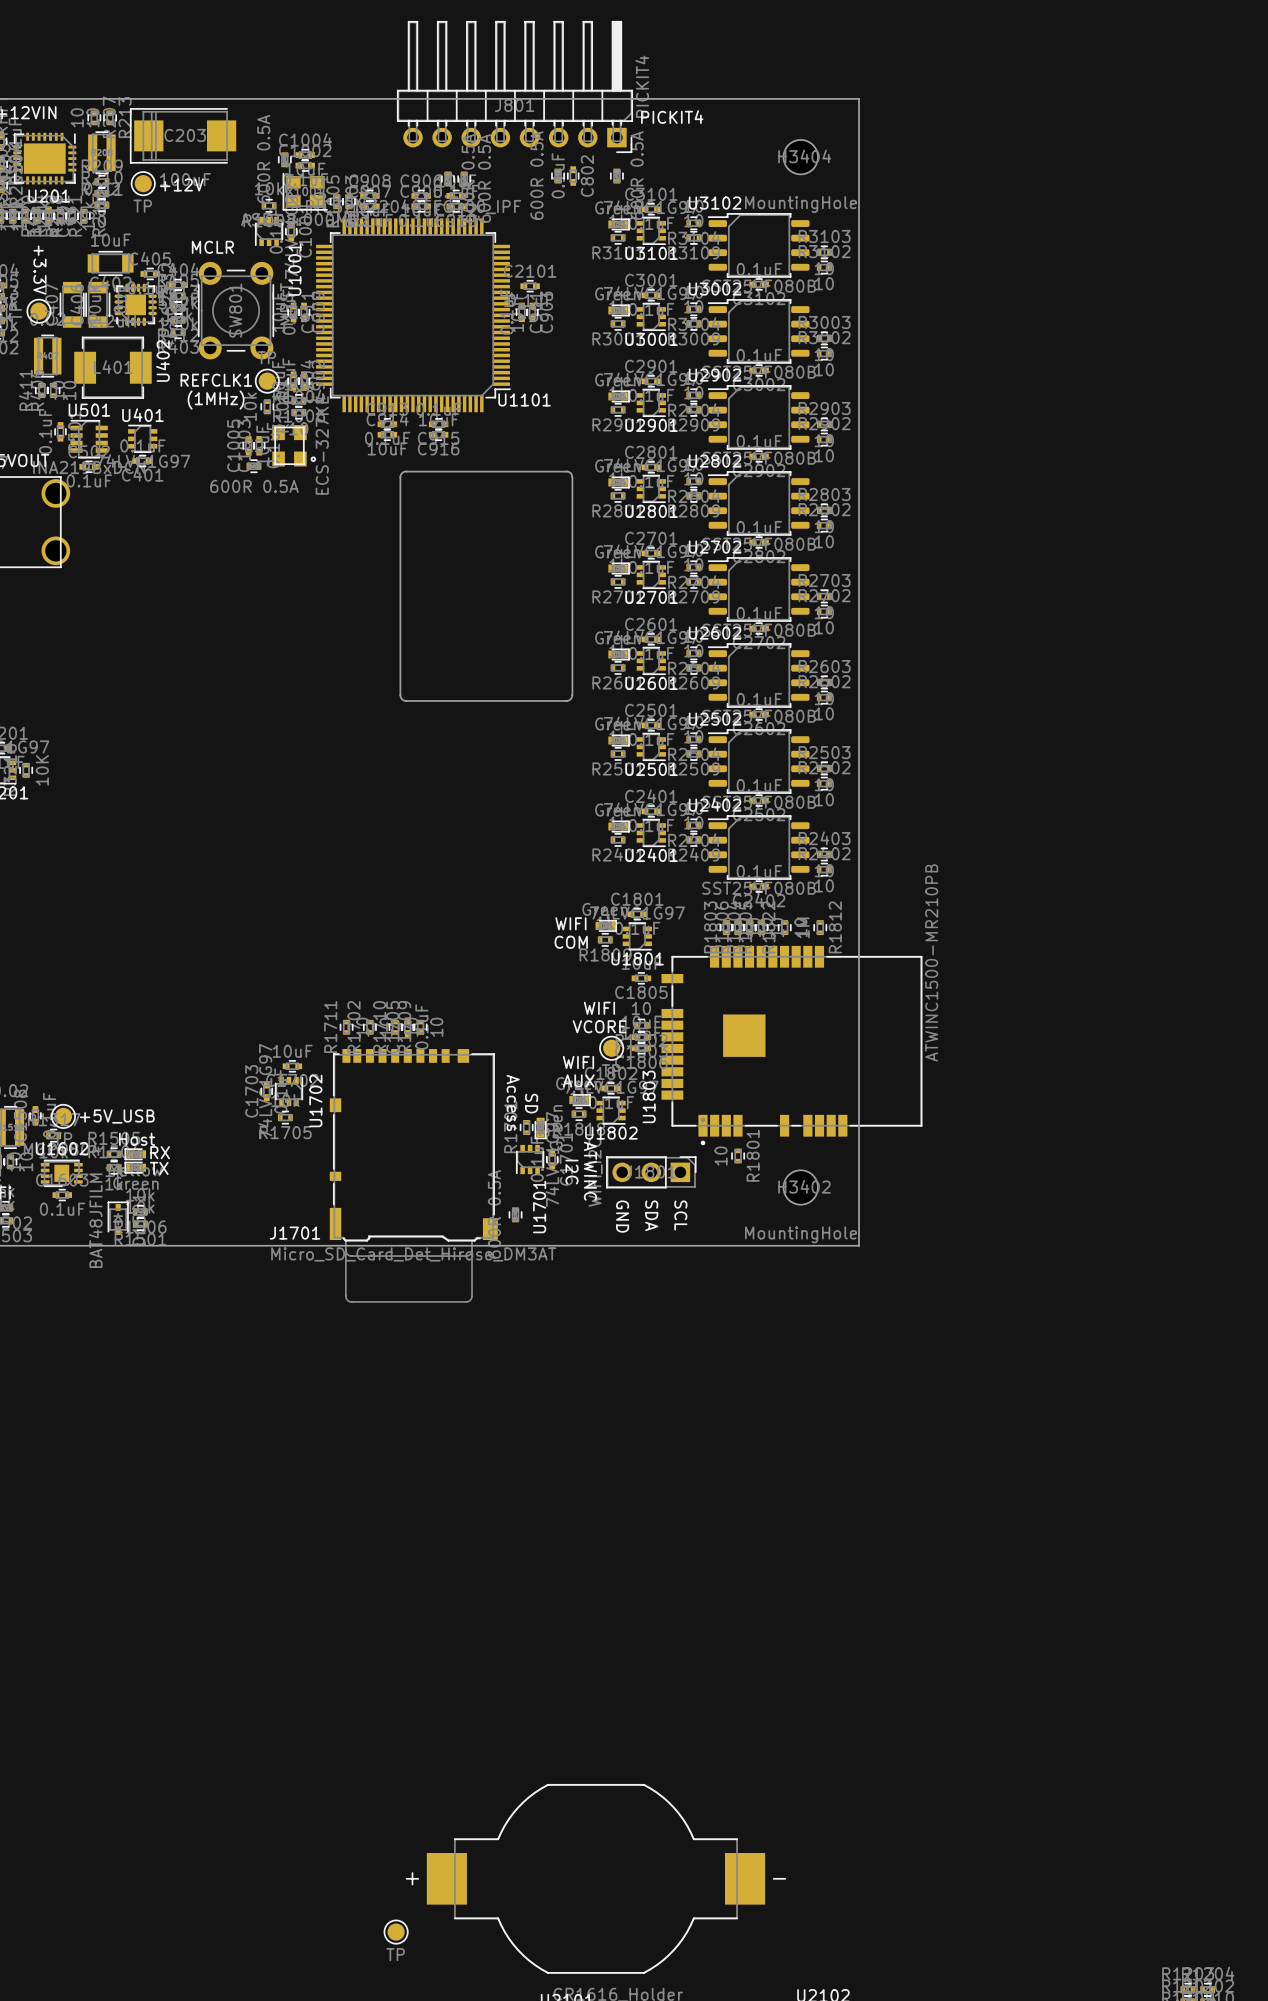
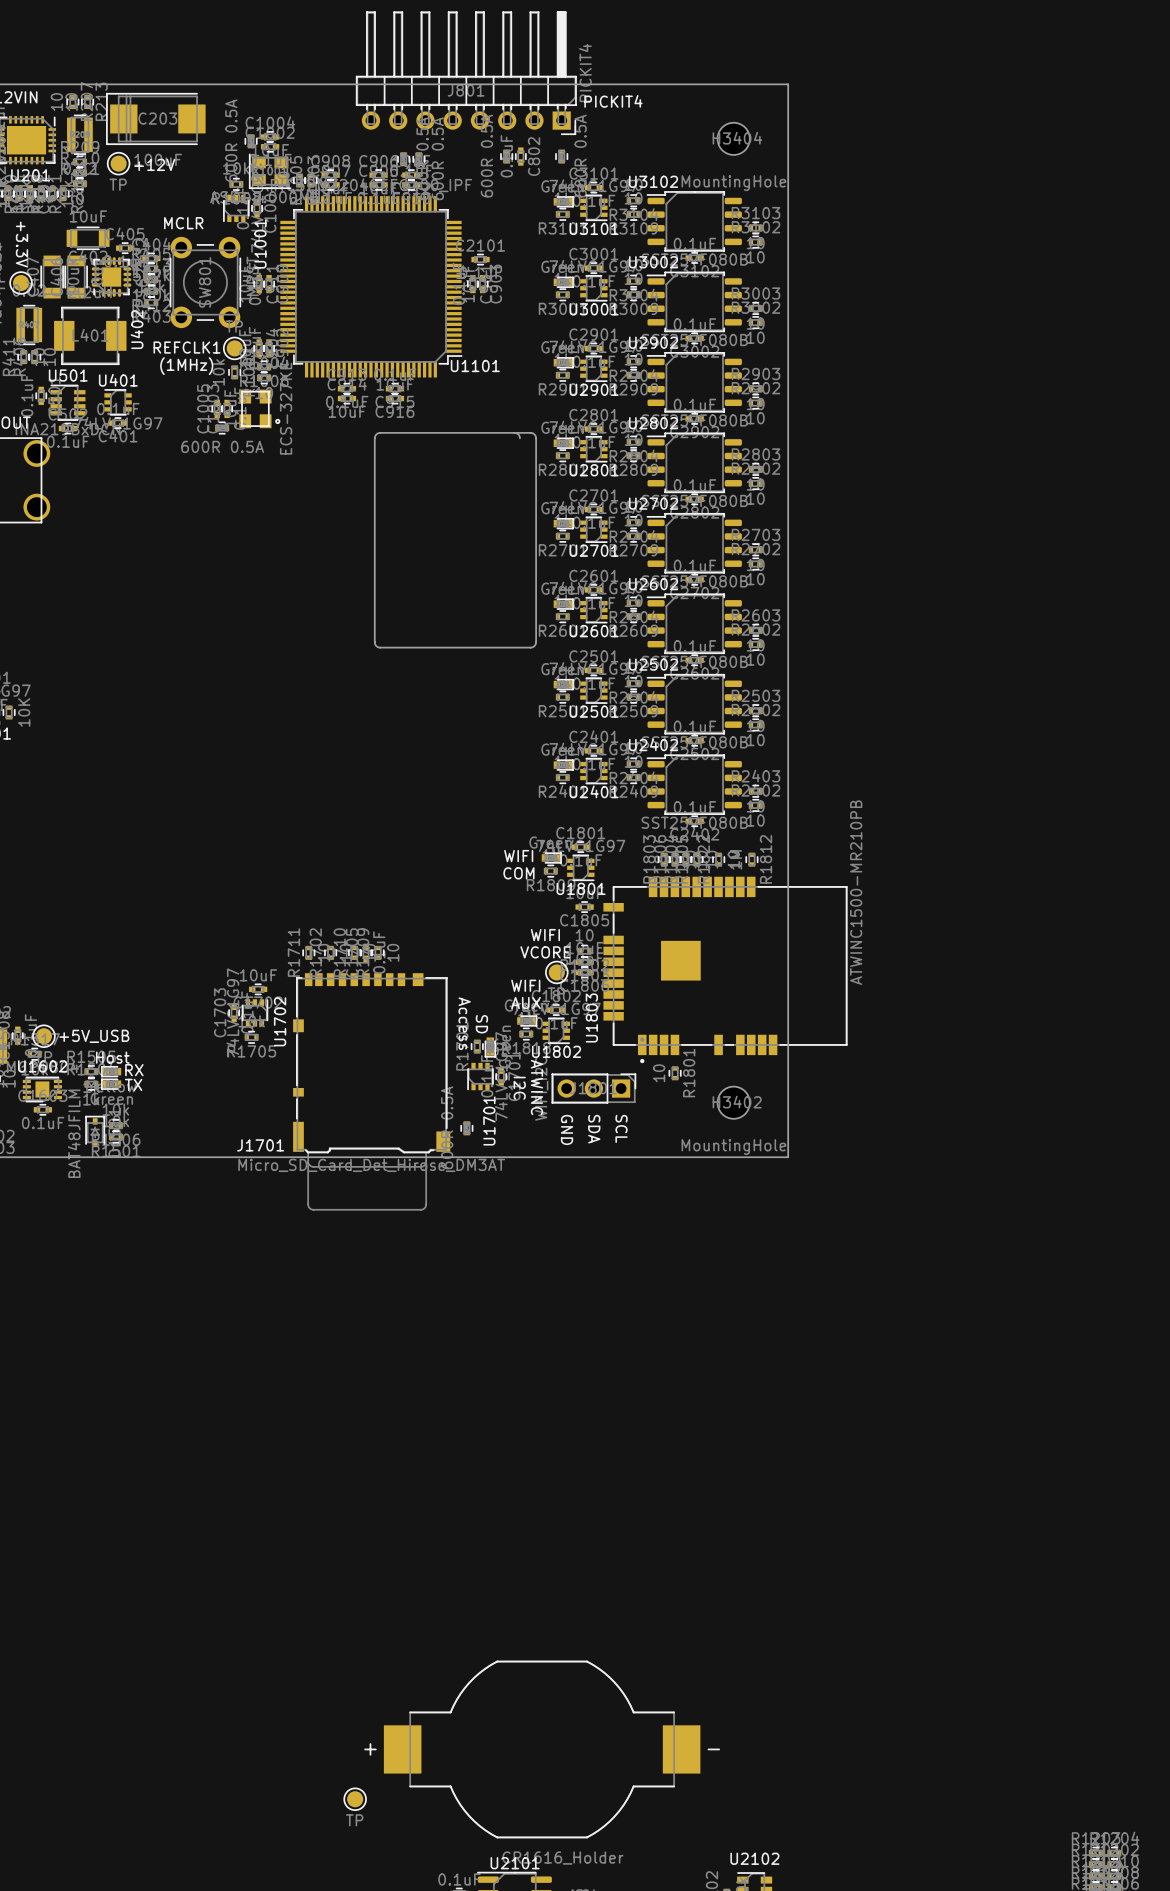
board edge: (406, 471) (402, 473) (400, 477) (400, 695) (404, 700) (422, 700) -> none
board edge: (406, 471) (566, 471) -> none
board edge: (572, 477) (572, 695) -> none
board edge: (572, 695) (570, 699) (566, 700) -> (380, 647) (376, 646) (374, 642) (375, 435) (380, 432) (531, 432) (536, 438) (536, 642) (532, 647) (514, 647)

